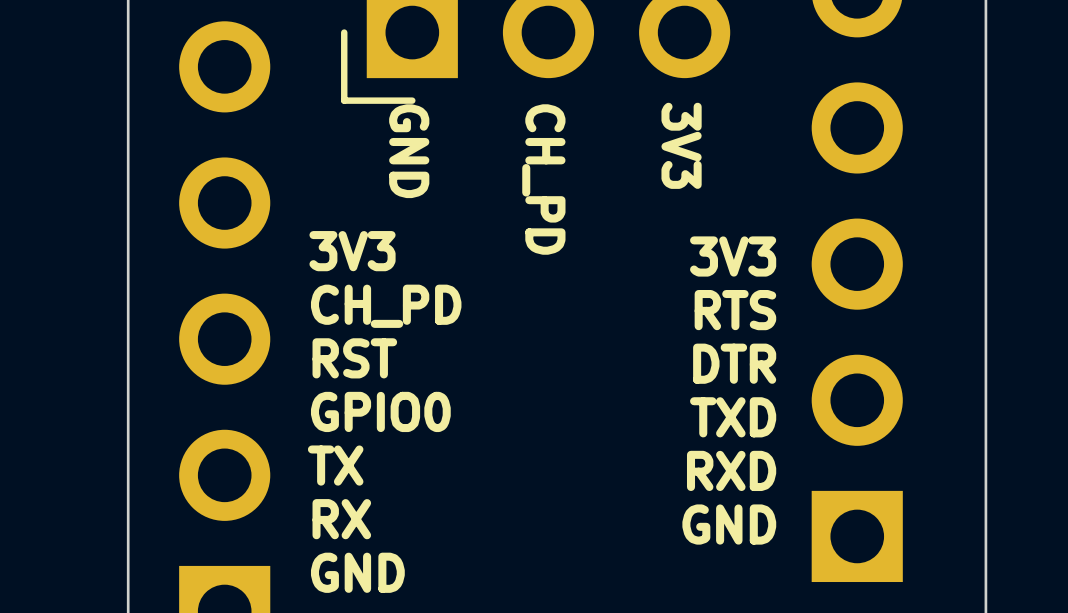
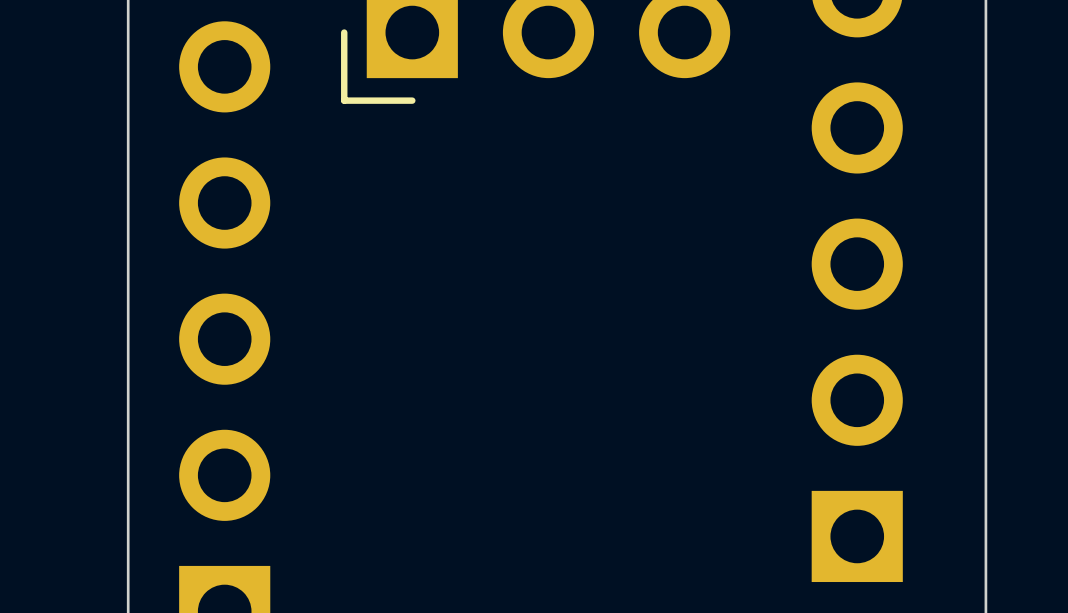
text: 3V3 (681, 145) -> none
text: GND (409, 151) -> none
text: CH_PD (543, 179) -> none
text: 3V3 (352, 251) -> none
text: 3V3 (733, 256) -> none
text: CH_PD (386, 306) -> none
text: RTS (735, 310) -> none
text: RST (354, 358) -> none
text: DTR (734, 363) -> none
text: GPIO0 (380, 411) -> none
text: TXD (733, 417) -> none
text: TX (335, 465) -> none
text: RXD (731, 470) -> none
text: RX (341, 519) -> none
text: GND (729, 524) -> none
text: GND (357, 572) -> none

